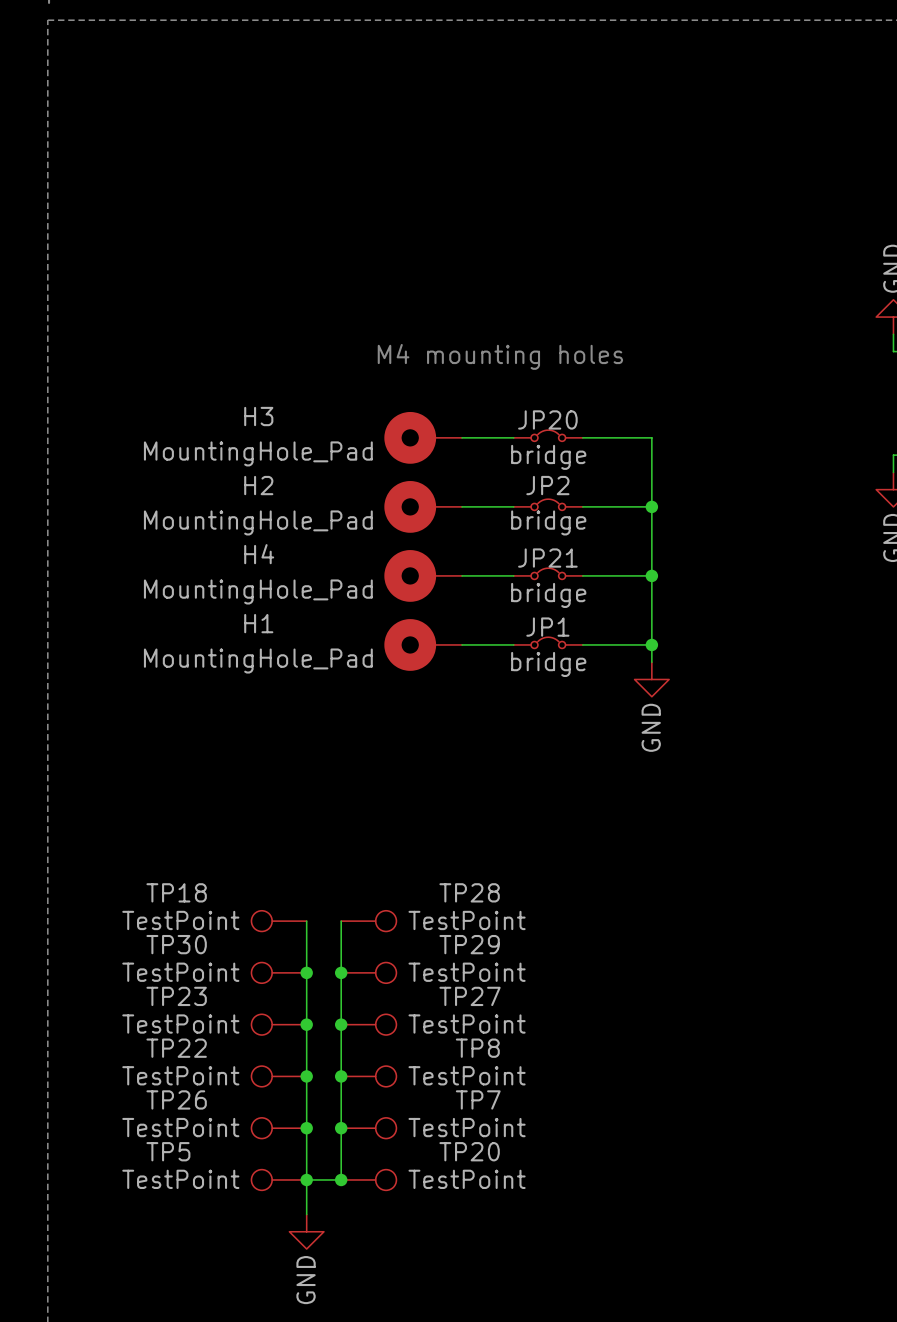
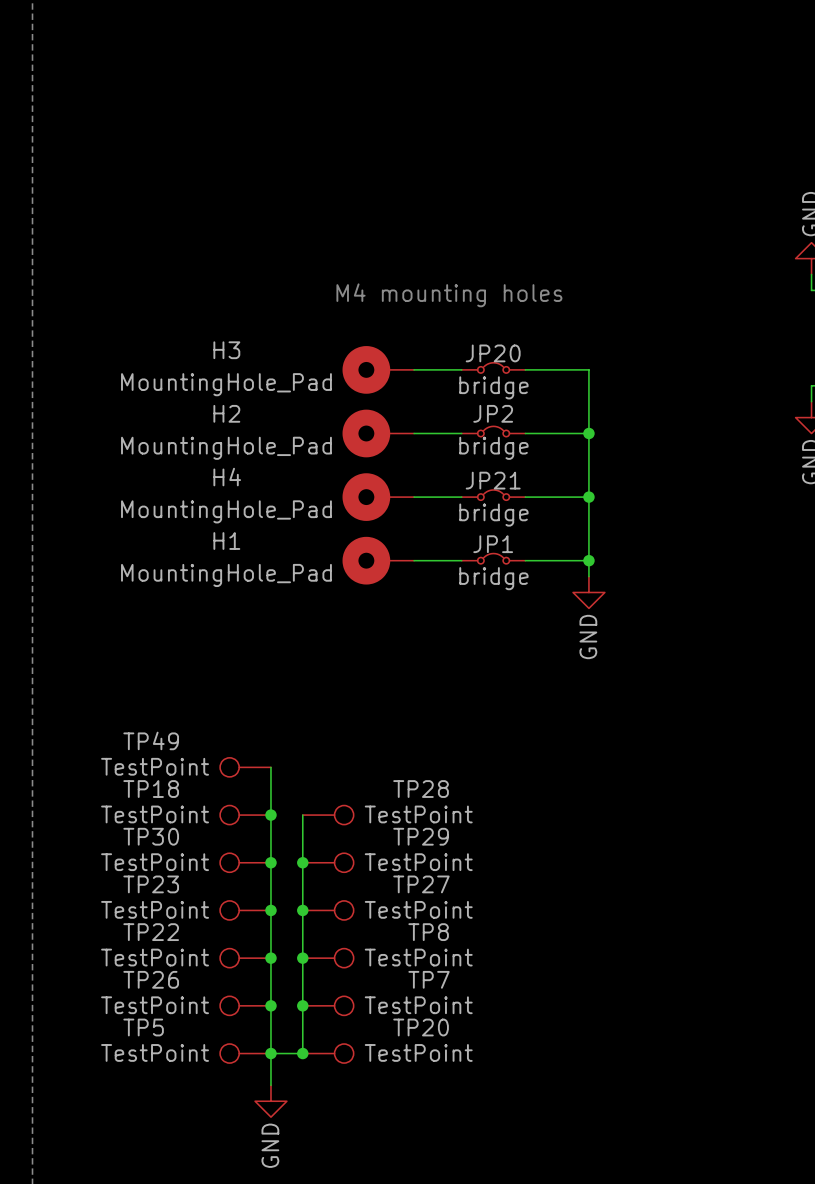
TP49: none -> TestPoint (245, 767)
wire: none -> (270, 767) (270, 815)
junction: none -> (270, 815)

